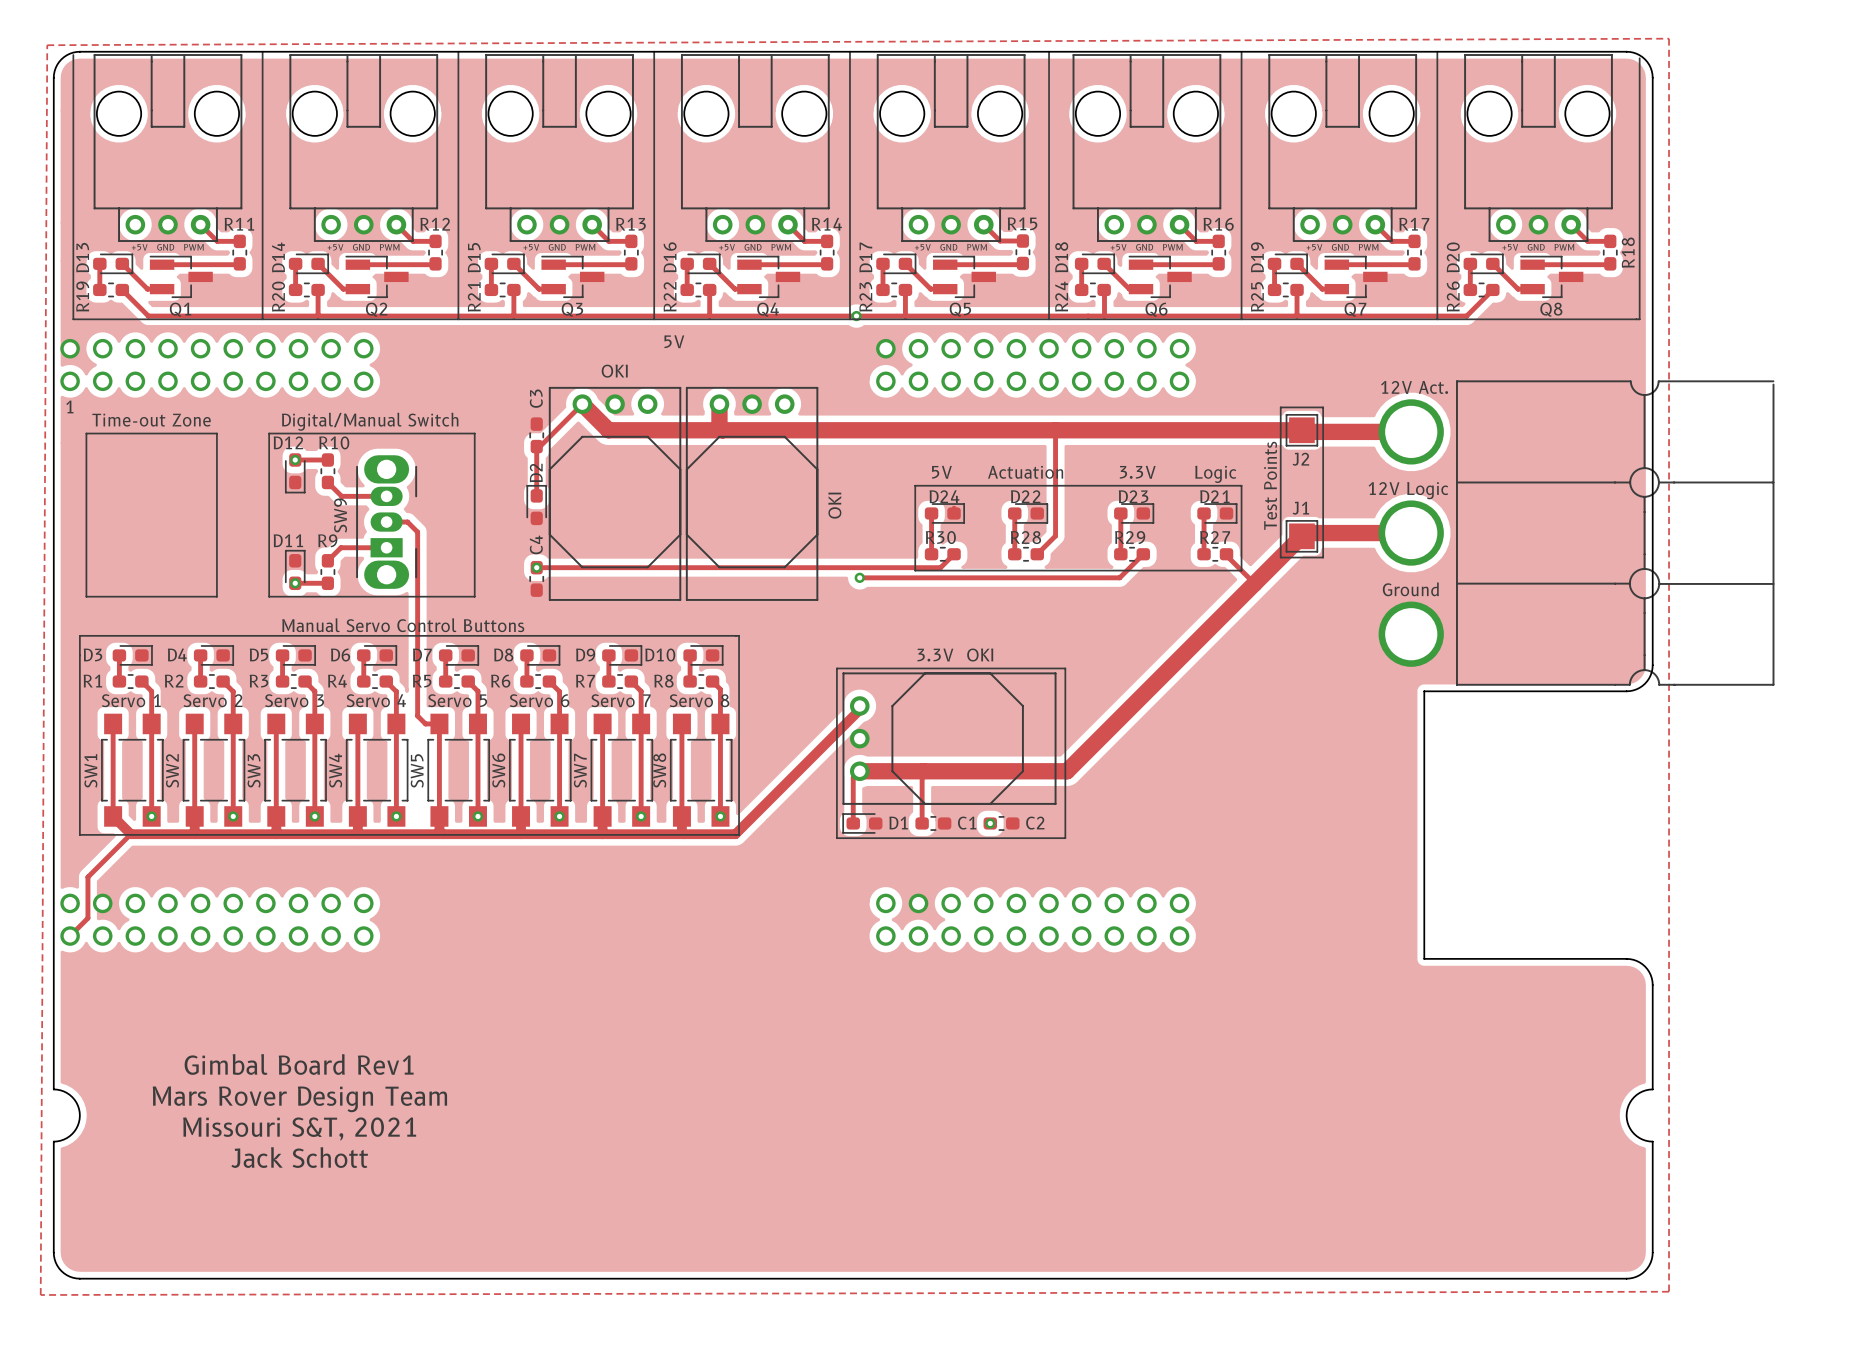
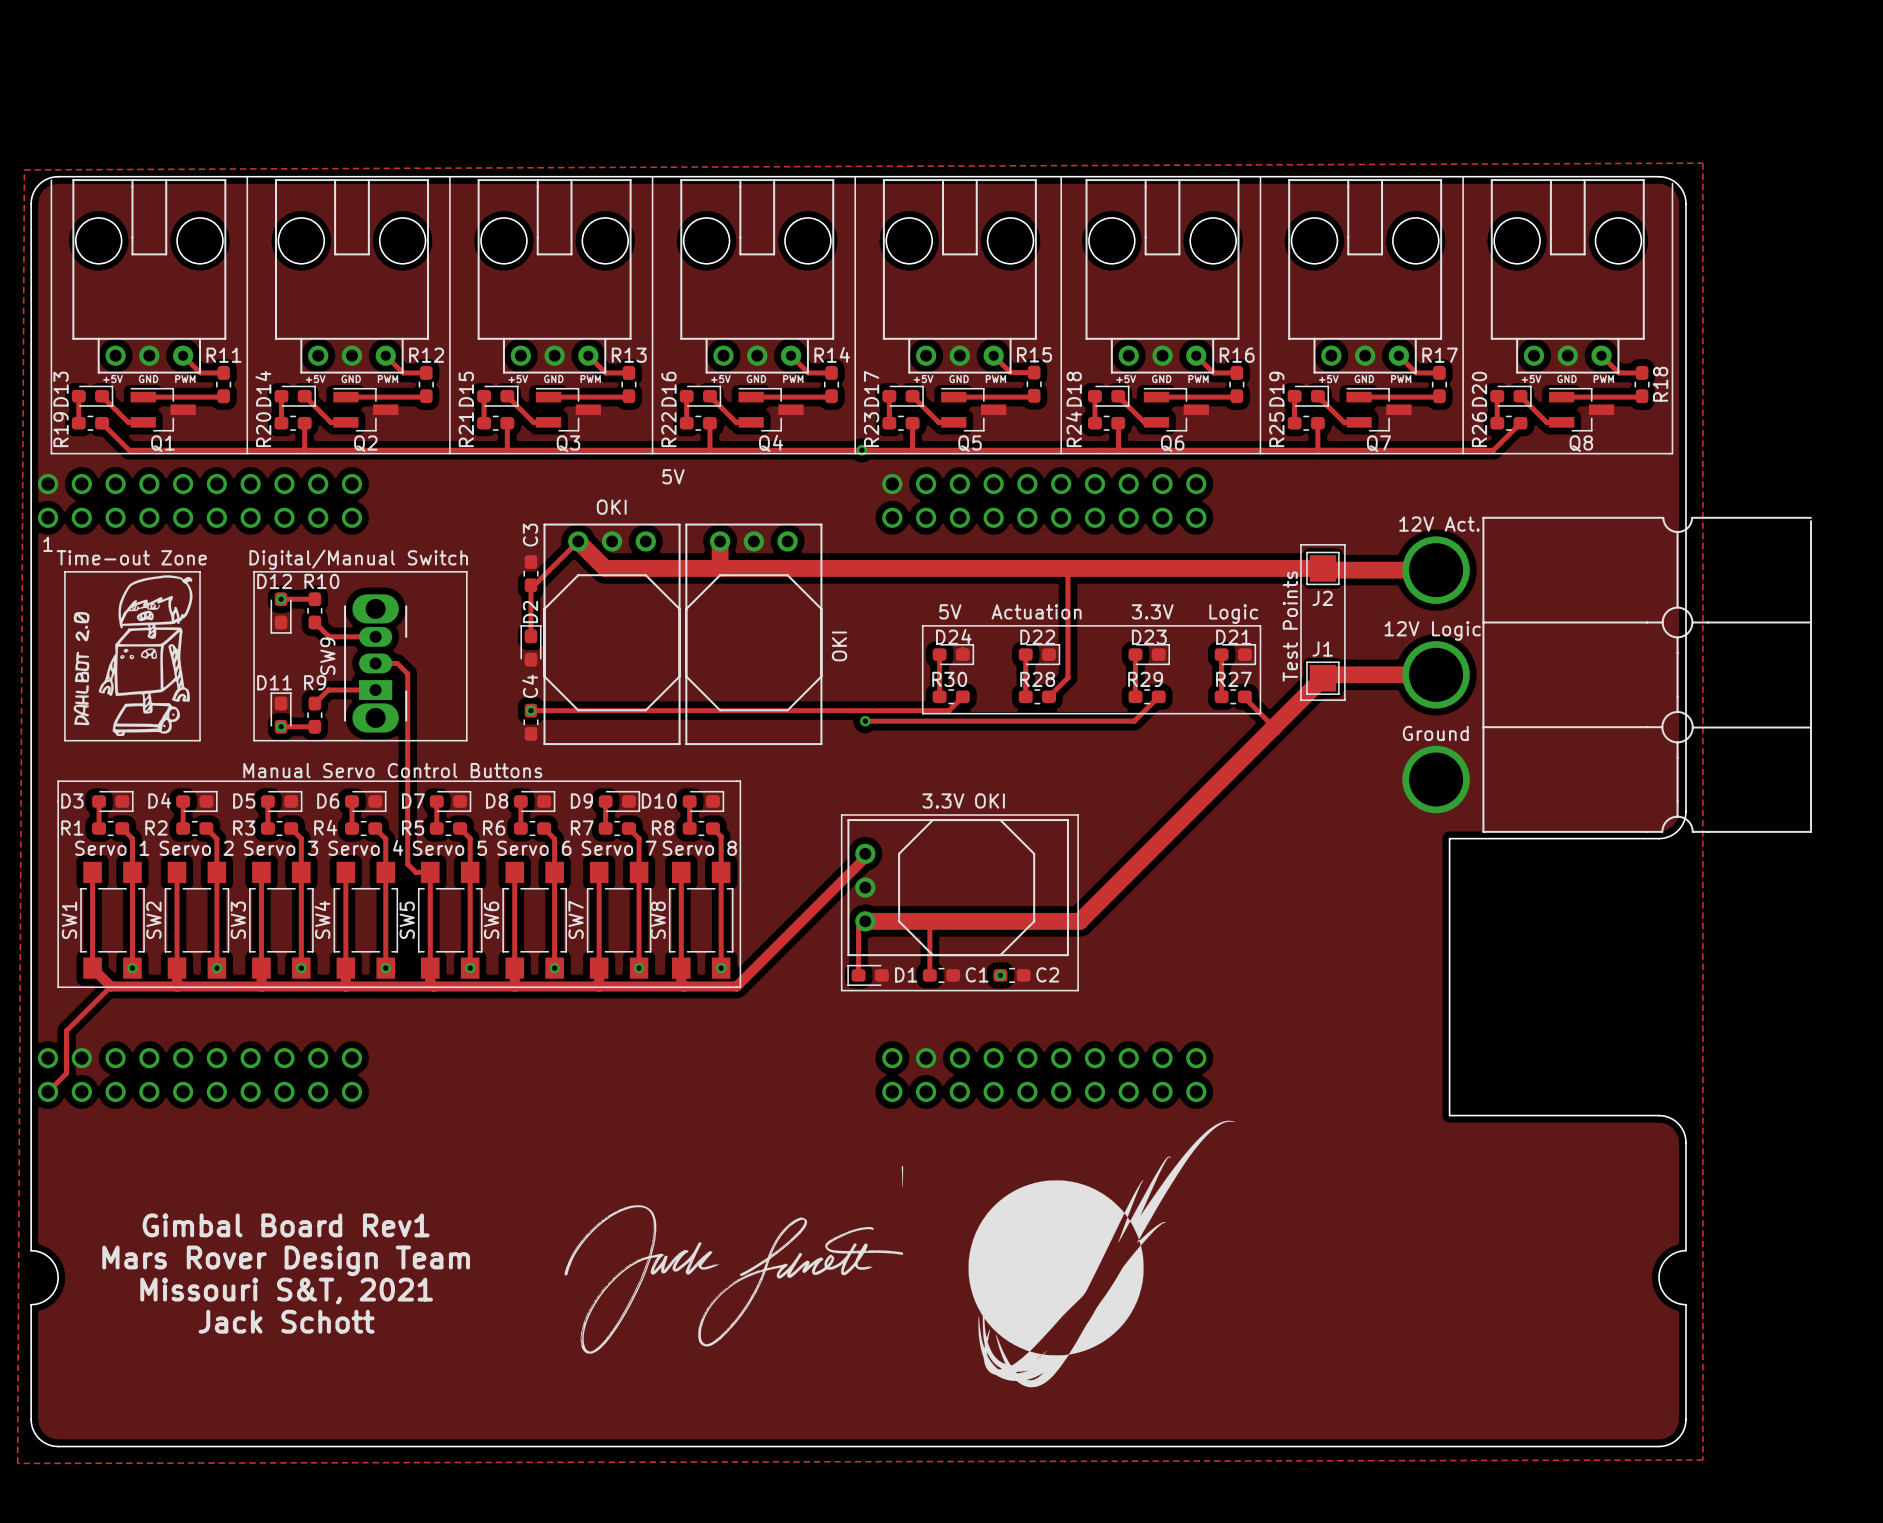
drawing: none -> [73, 575, 193, 737]
drawing: none -> [968, 1120, 1235, 1388]
drawing: none -> [564, 1166, 904, 1354]

